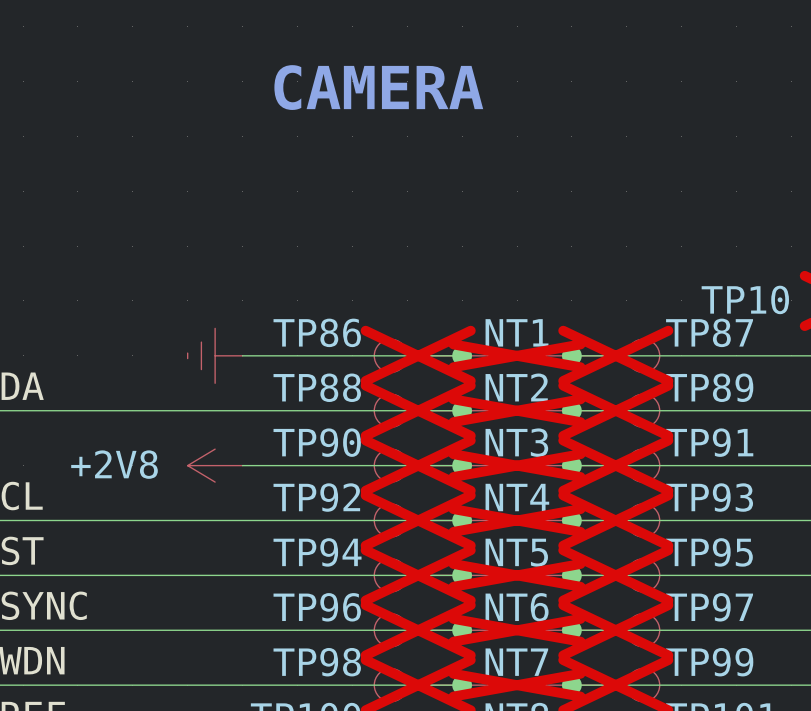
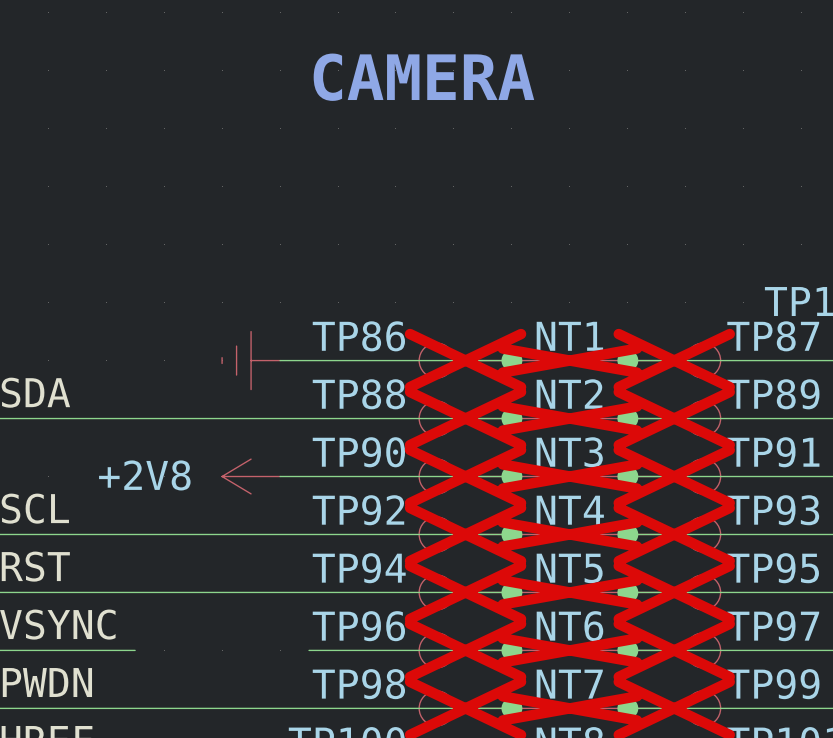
wire: (105, 630) (270, 630) -> none

